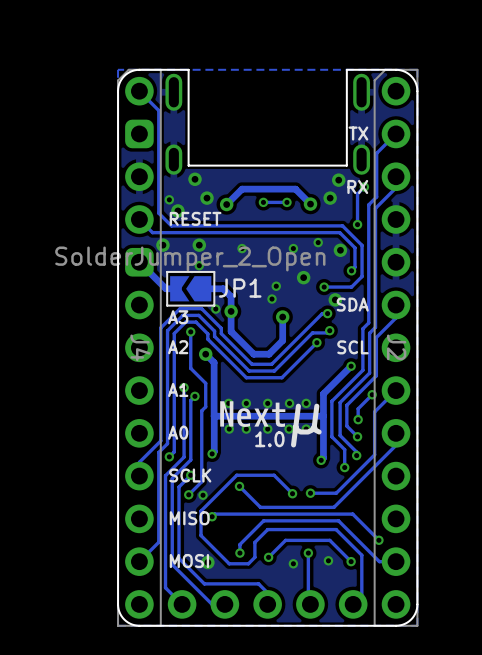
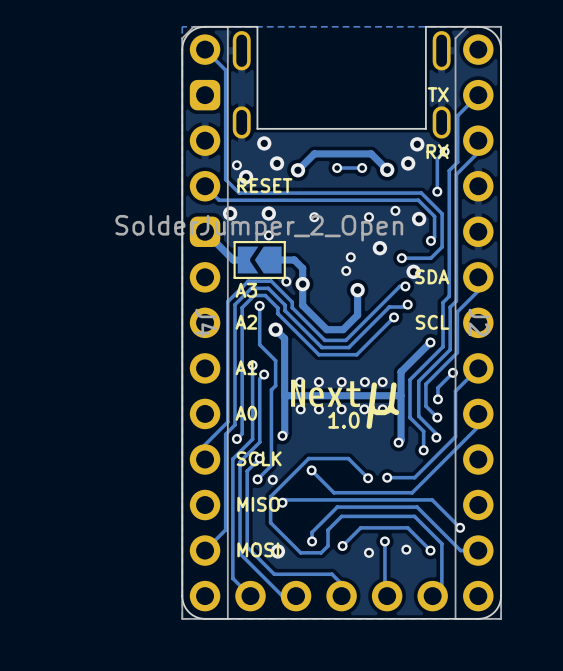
JP1 name: JP1 (240, 288) -> none

